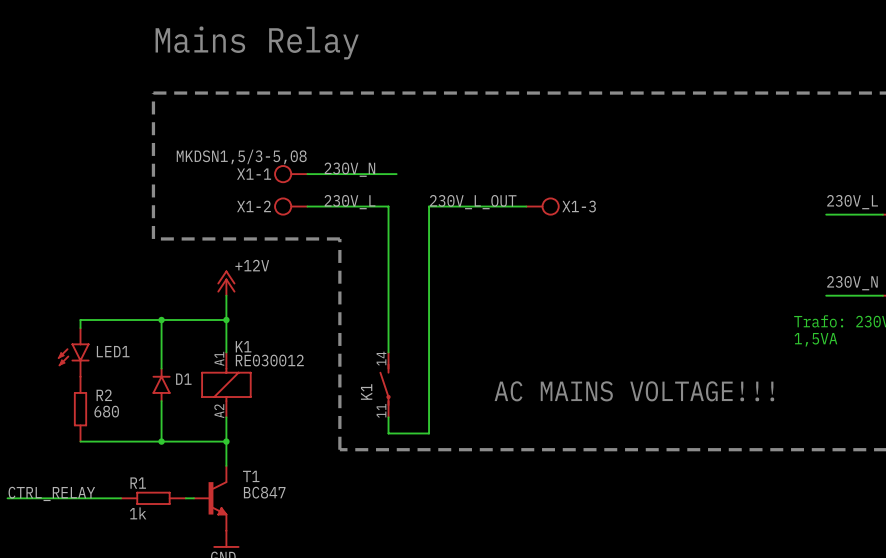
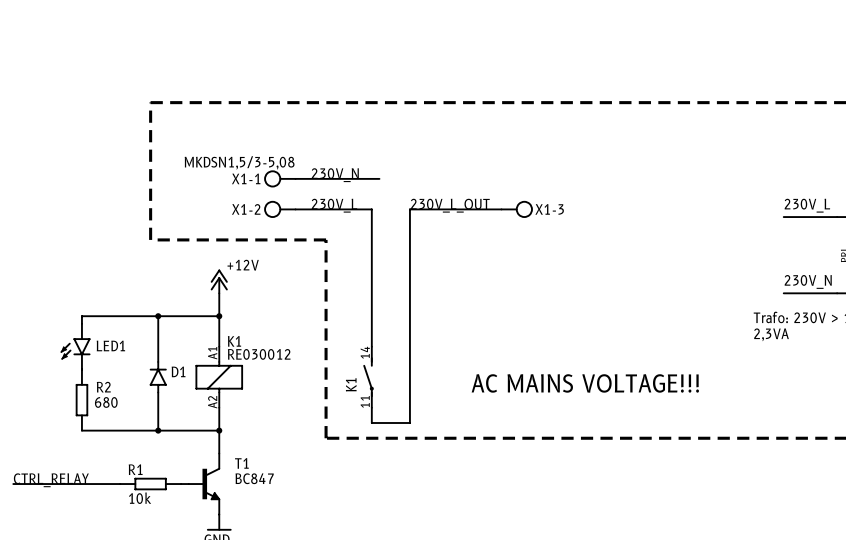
text: Mains Relay (257, 42) -> none
text: 1,5VA (815, 339) -> 2,3VA (771, 334)
R1 value: 1k (138, 513) -> 10k (140, 498)

